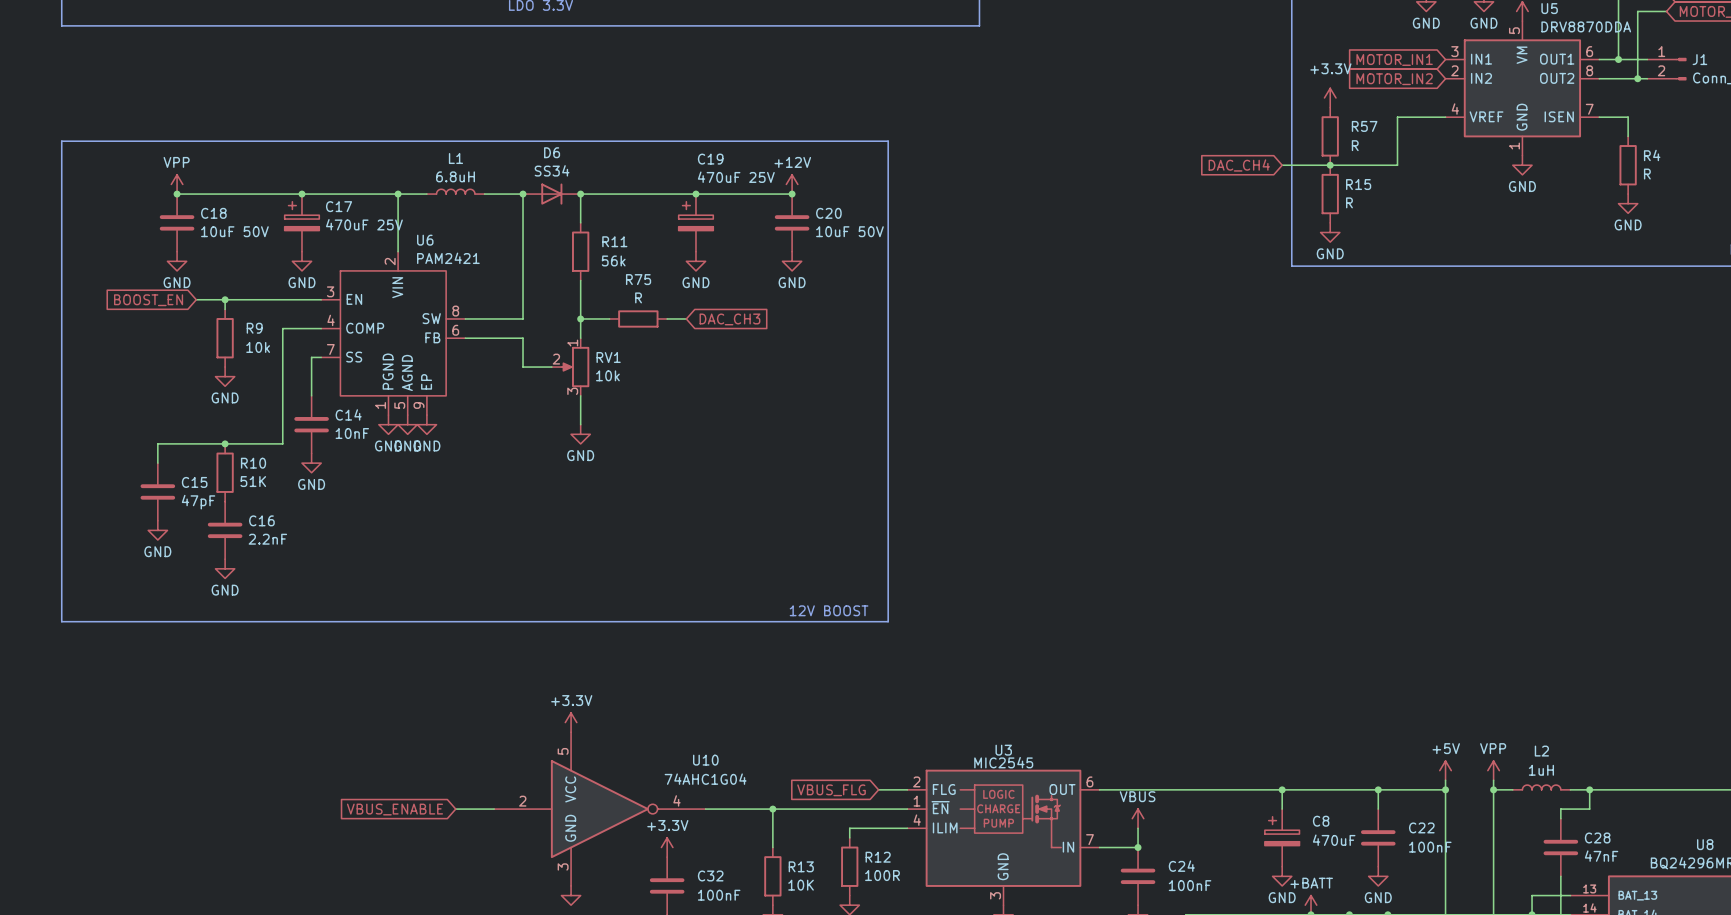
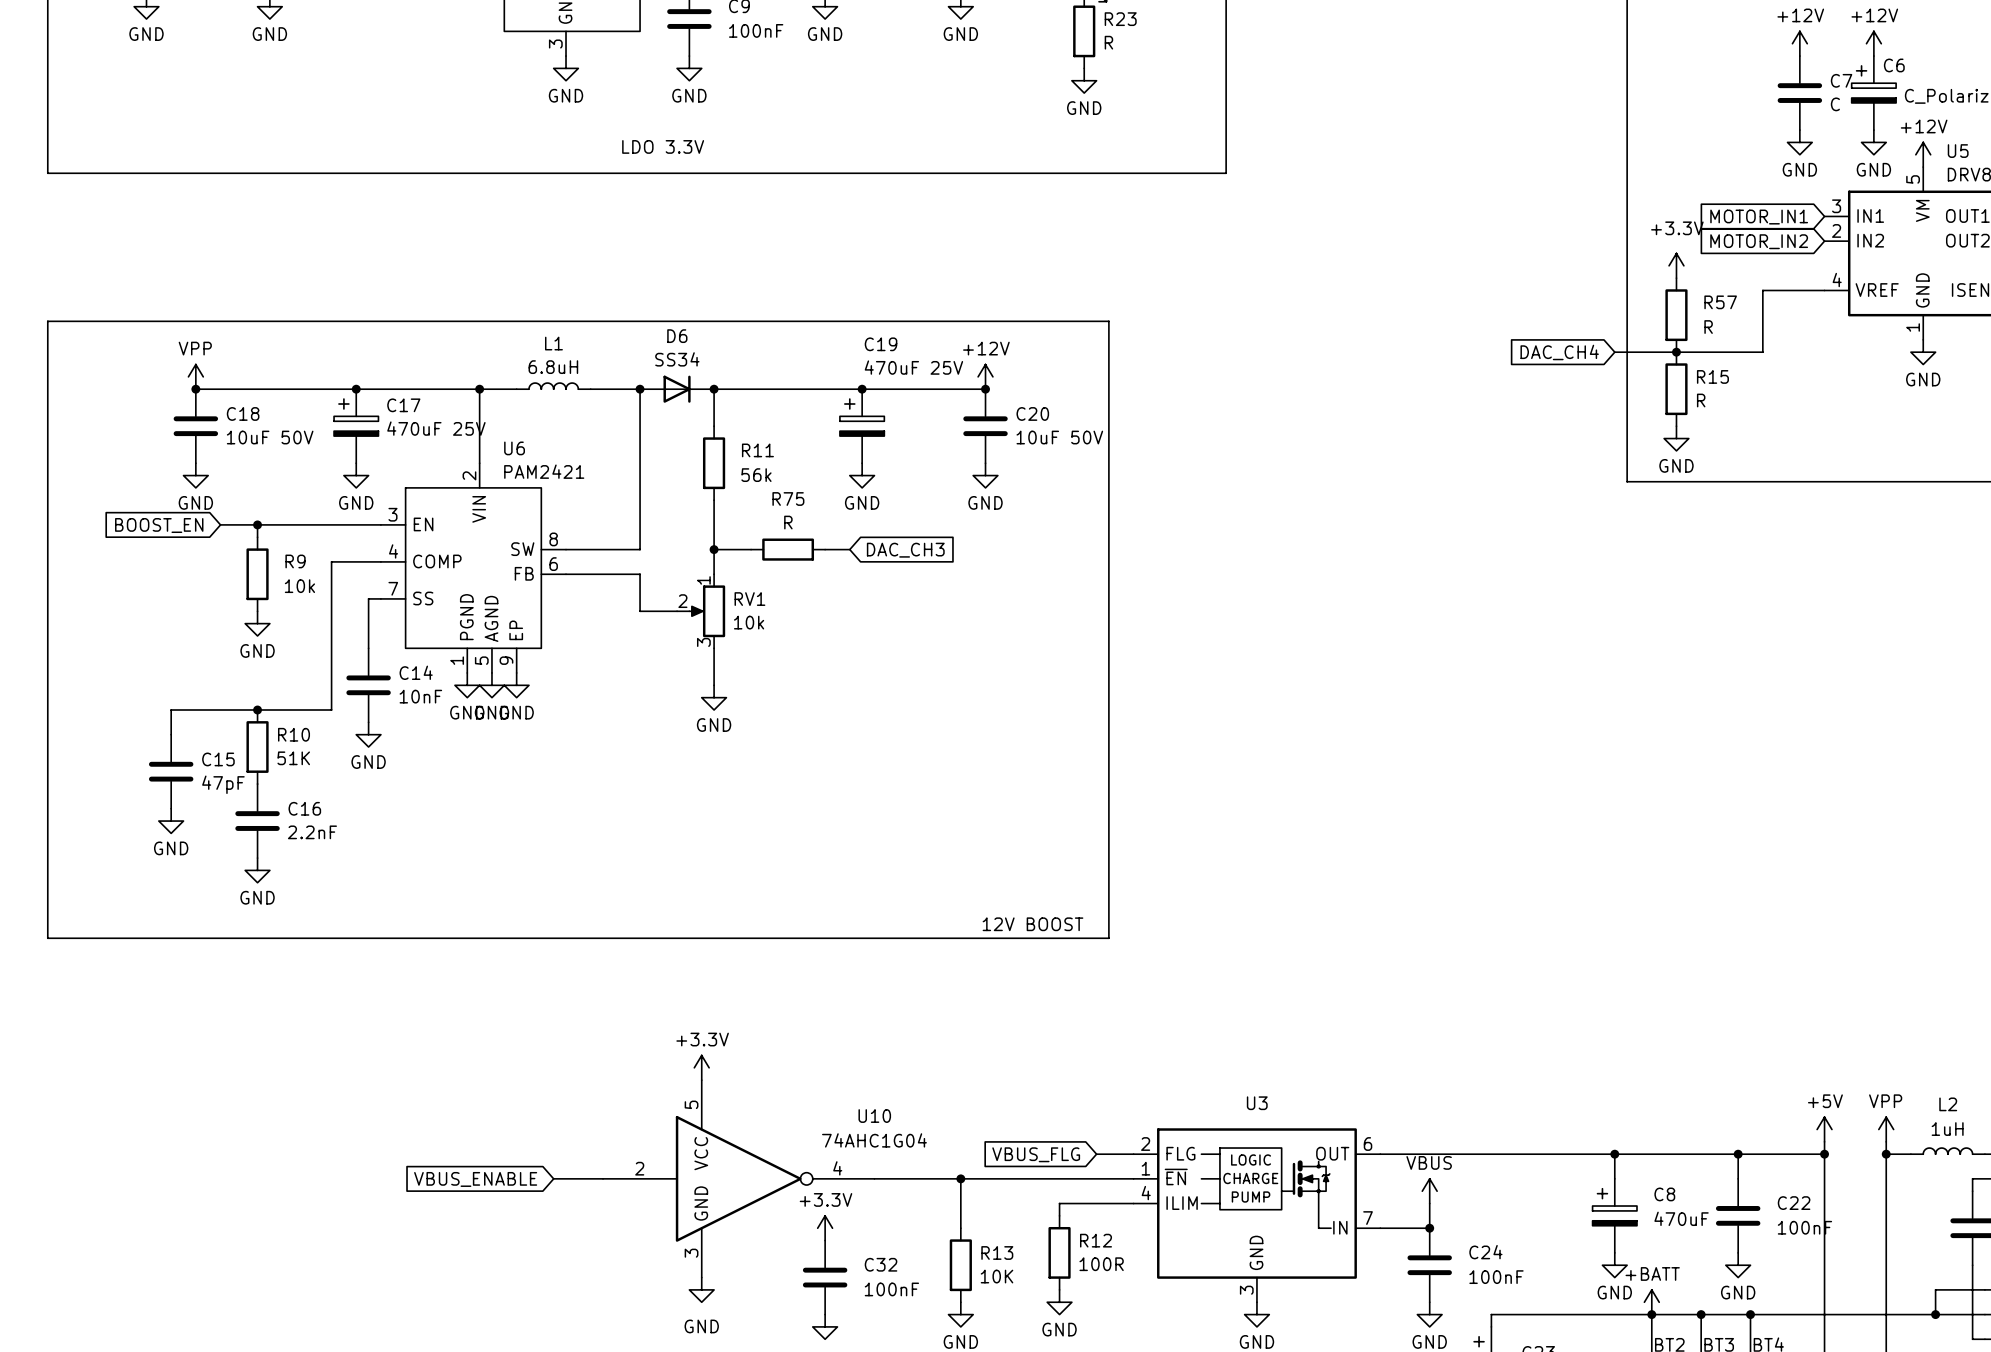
U3 value: MIC2545 (1003, 762) -> none

